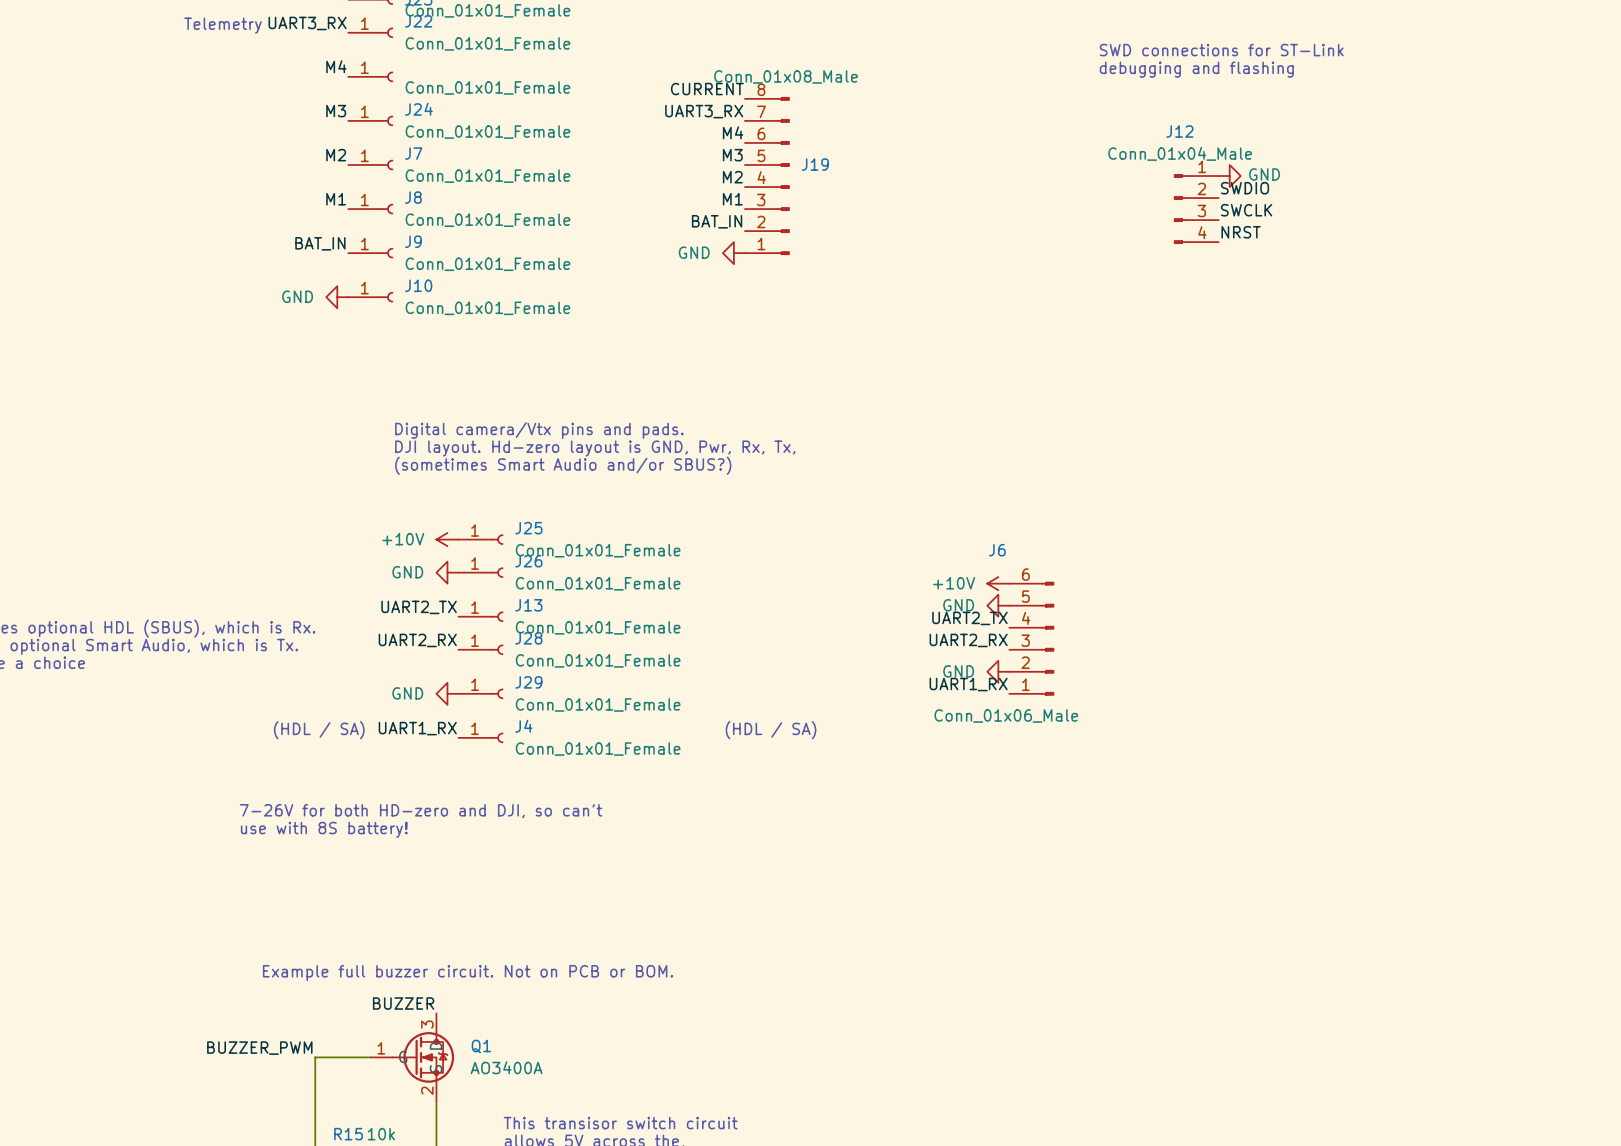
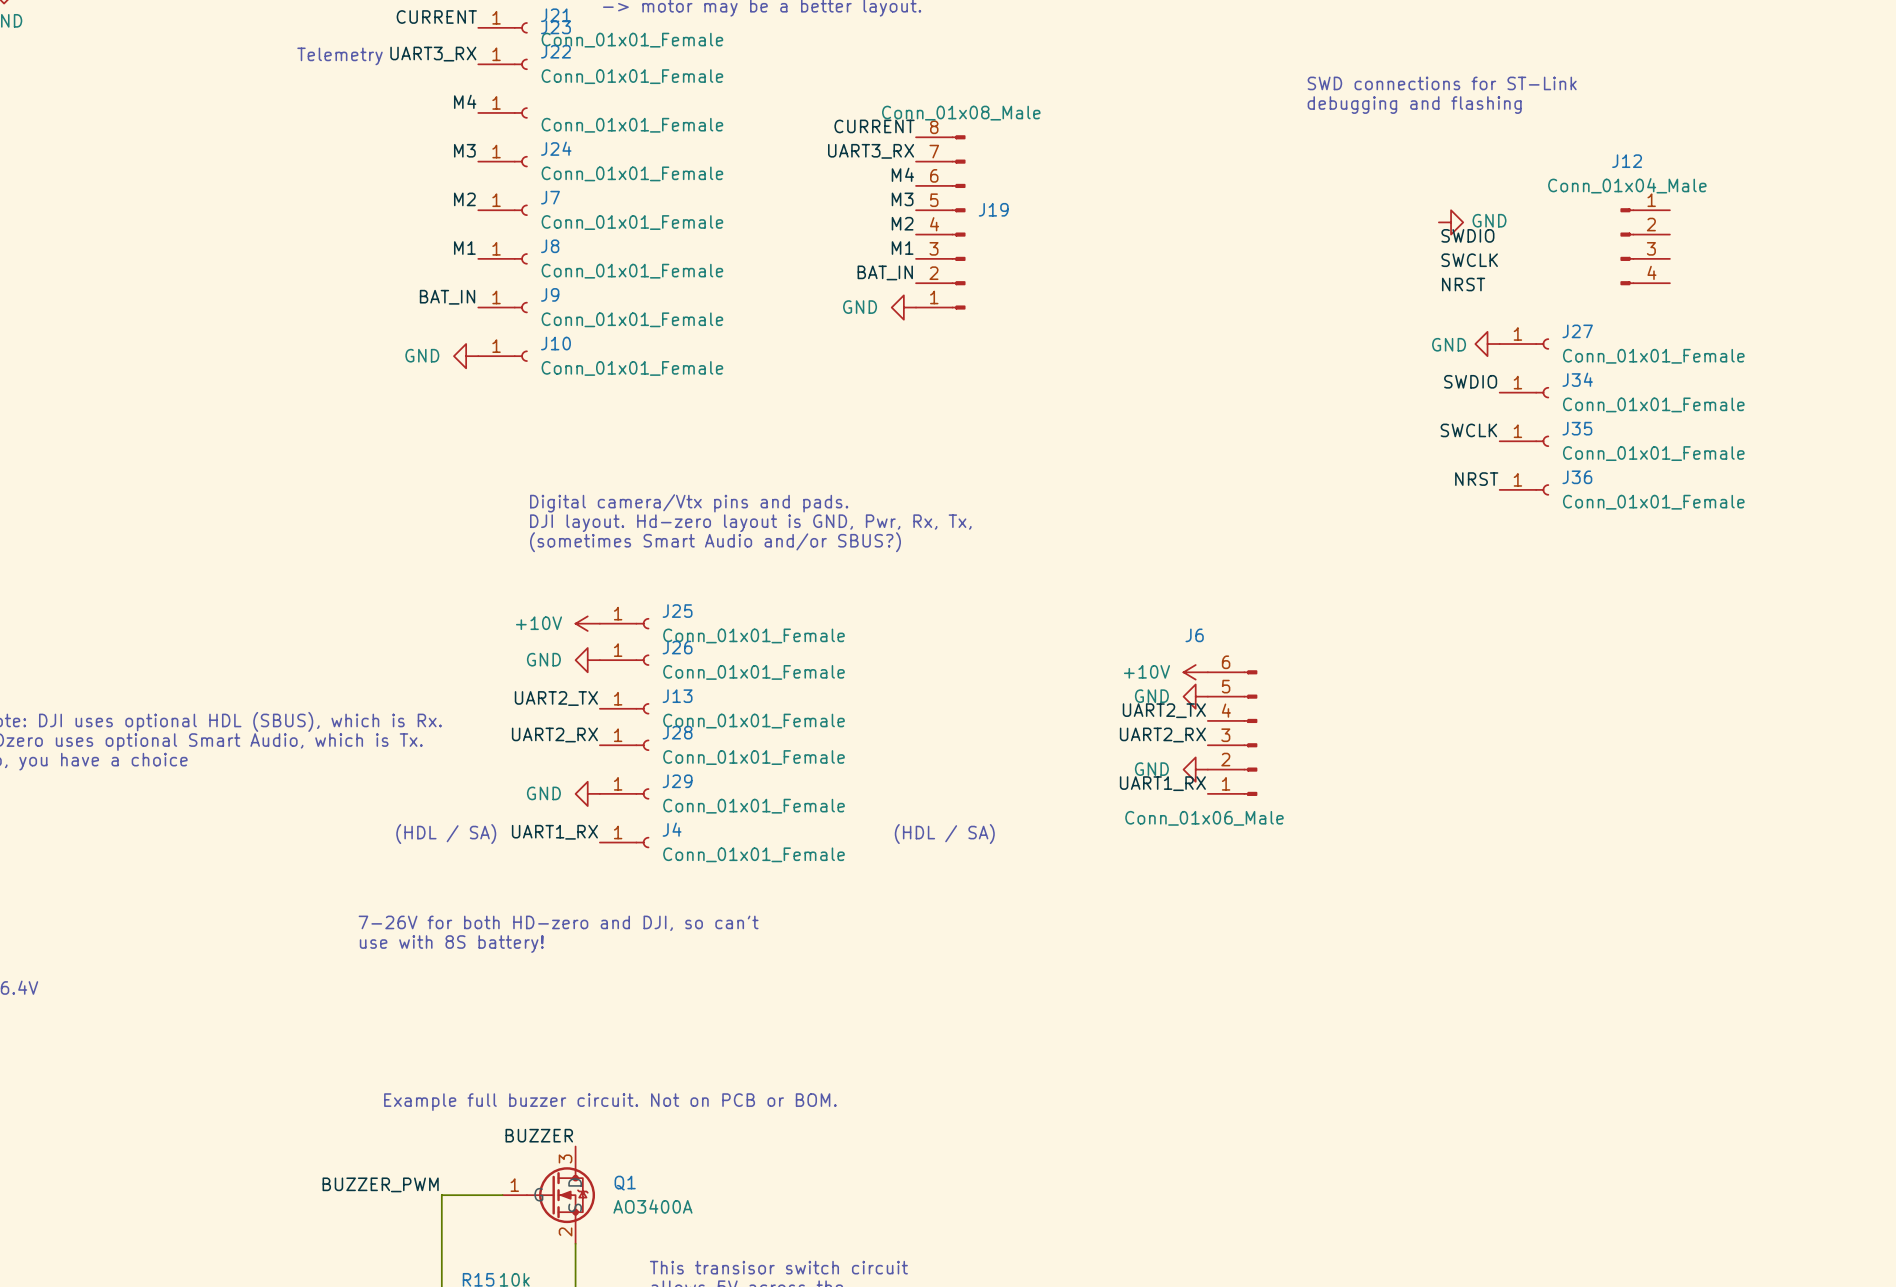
J12 position: (1196, 209) -> (1645, 246)
power symbol: none -> GND (1487, 344)
J27: none -> Conn_01x01_Female (1524, 344)
label: none -> SWDIO (1470, 381)
J34: none -> Conn_01x01_Female (1524, 392)
label: none -> SWCLK (1468, 430)
J35: none -> Conn_01x01_Female (1524, 441)
label: none -> NRST (1476, 479)
J36: none -> Conn_01x01_Female (1524, 489)

